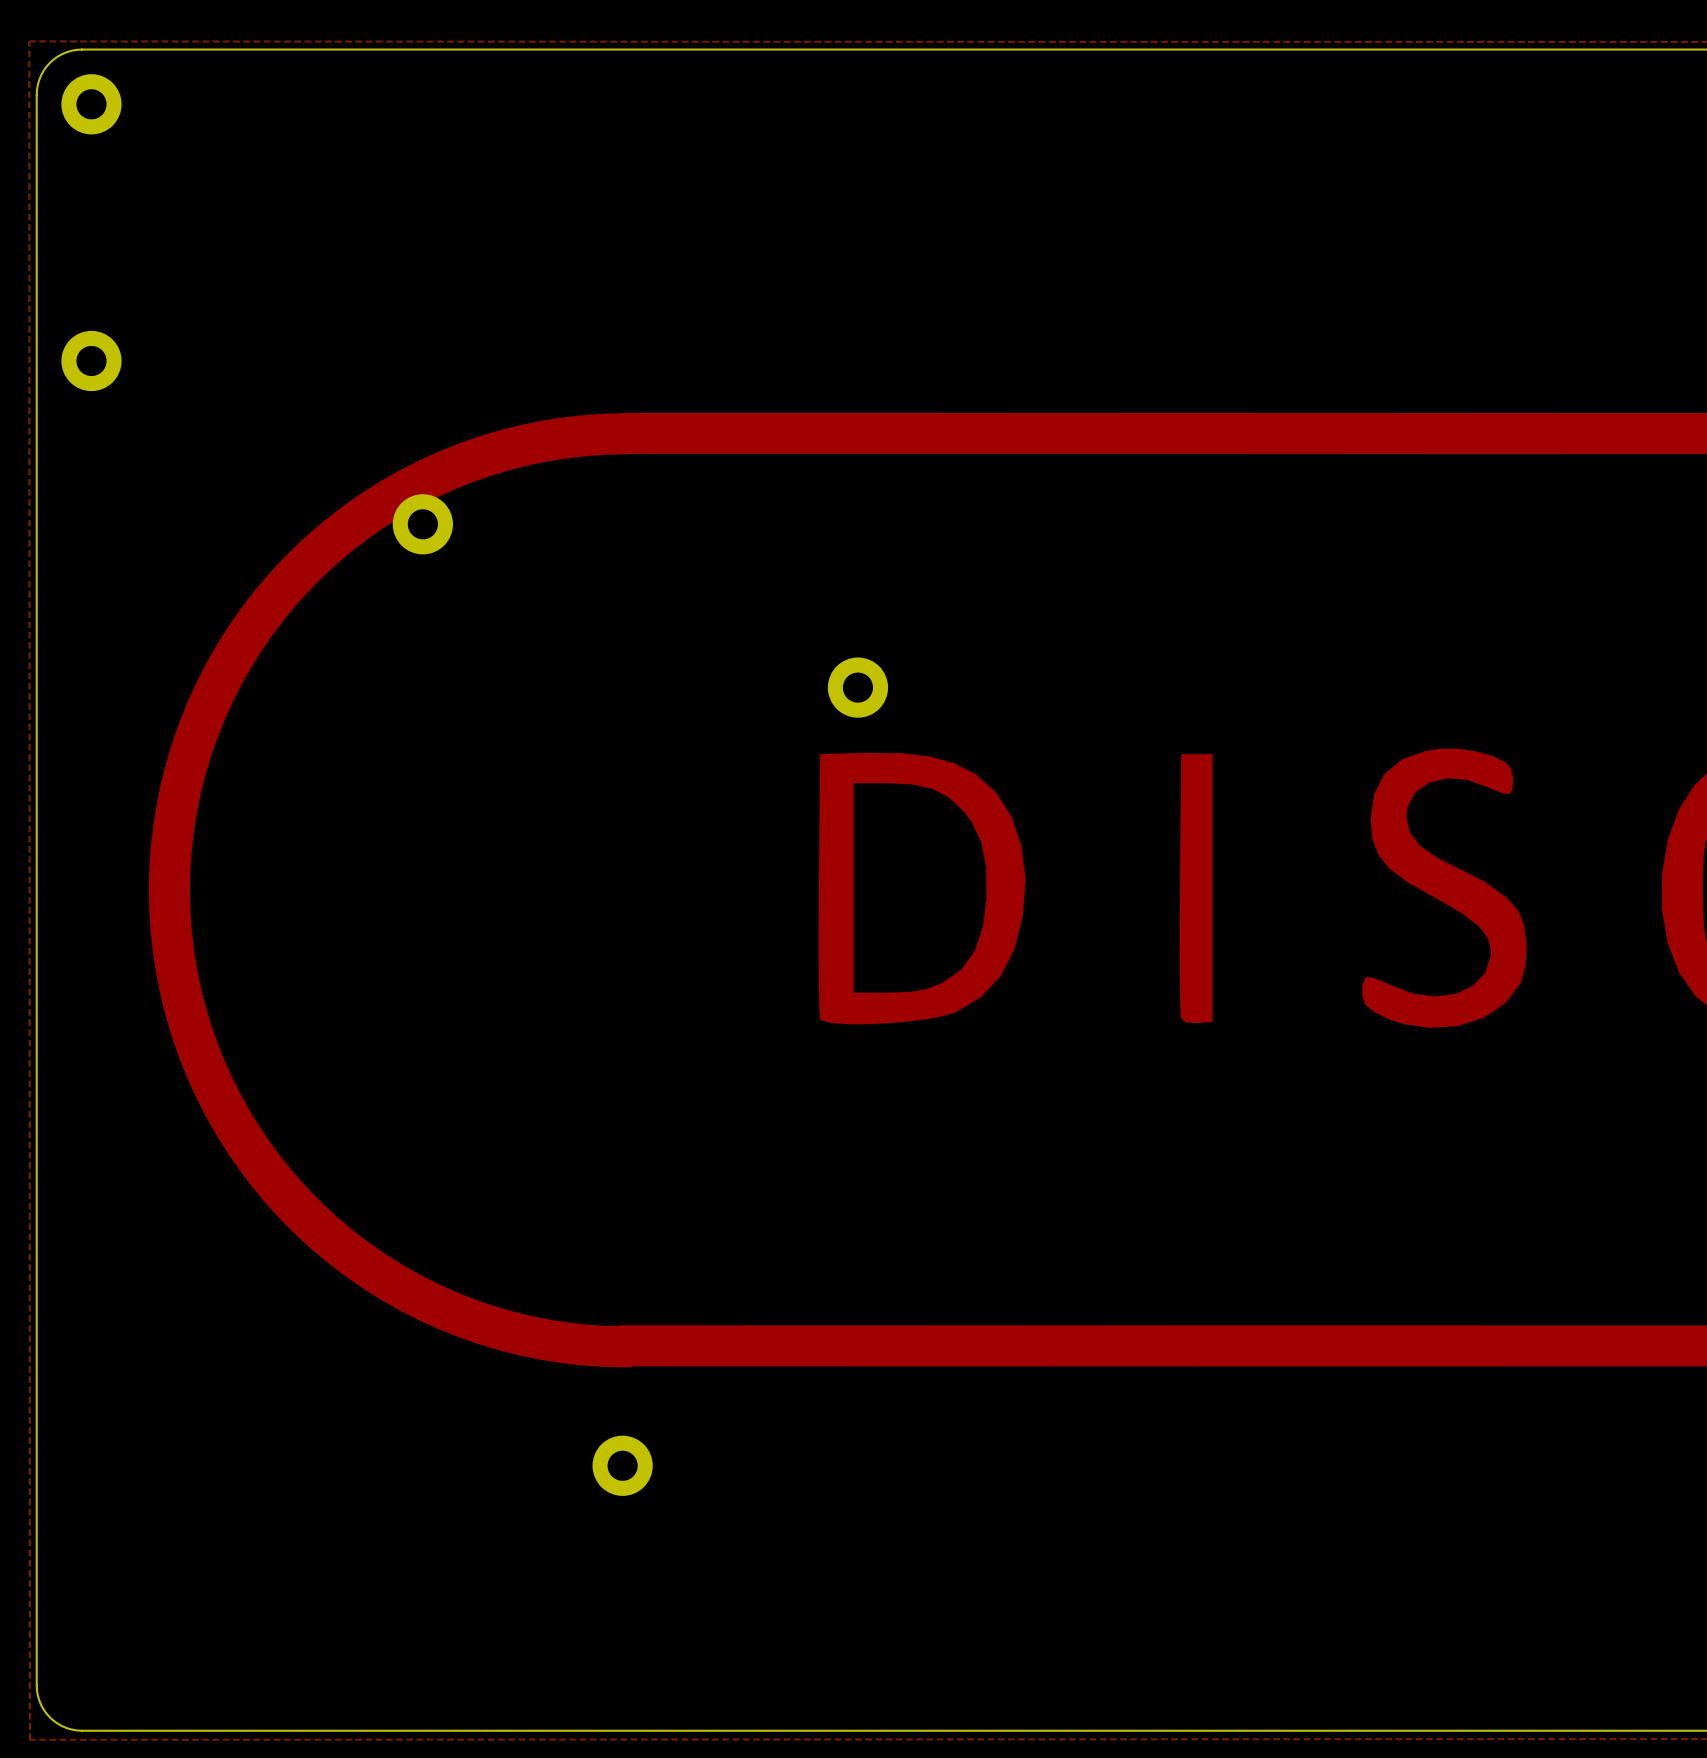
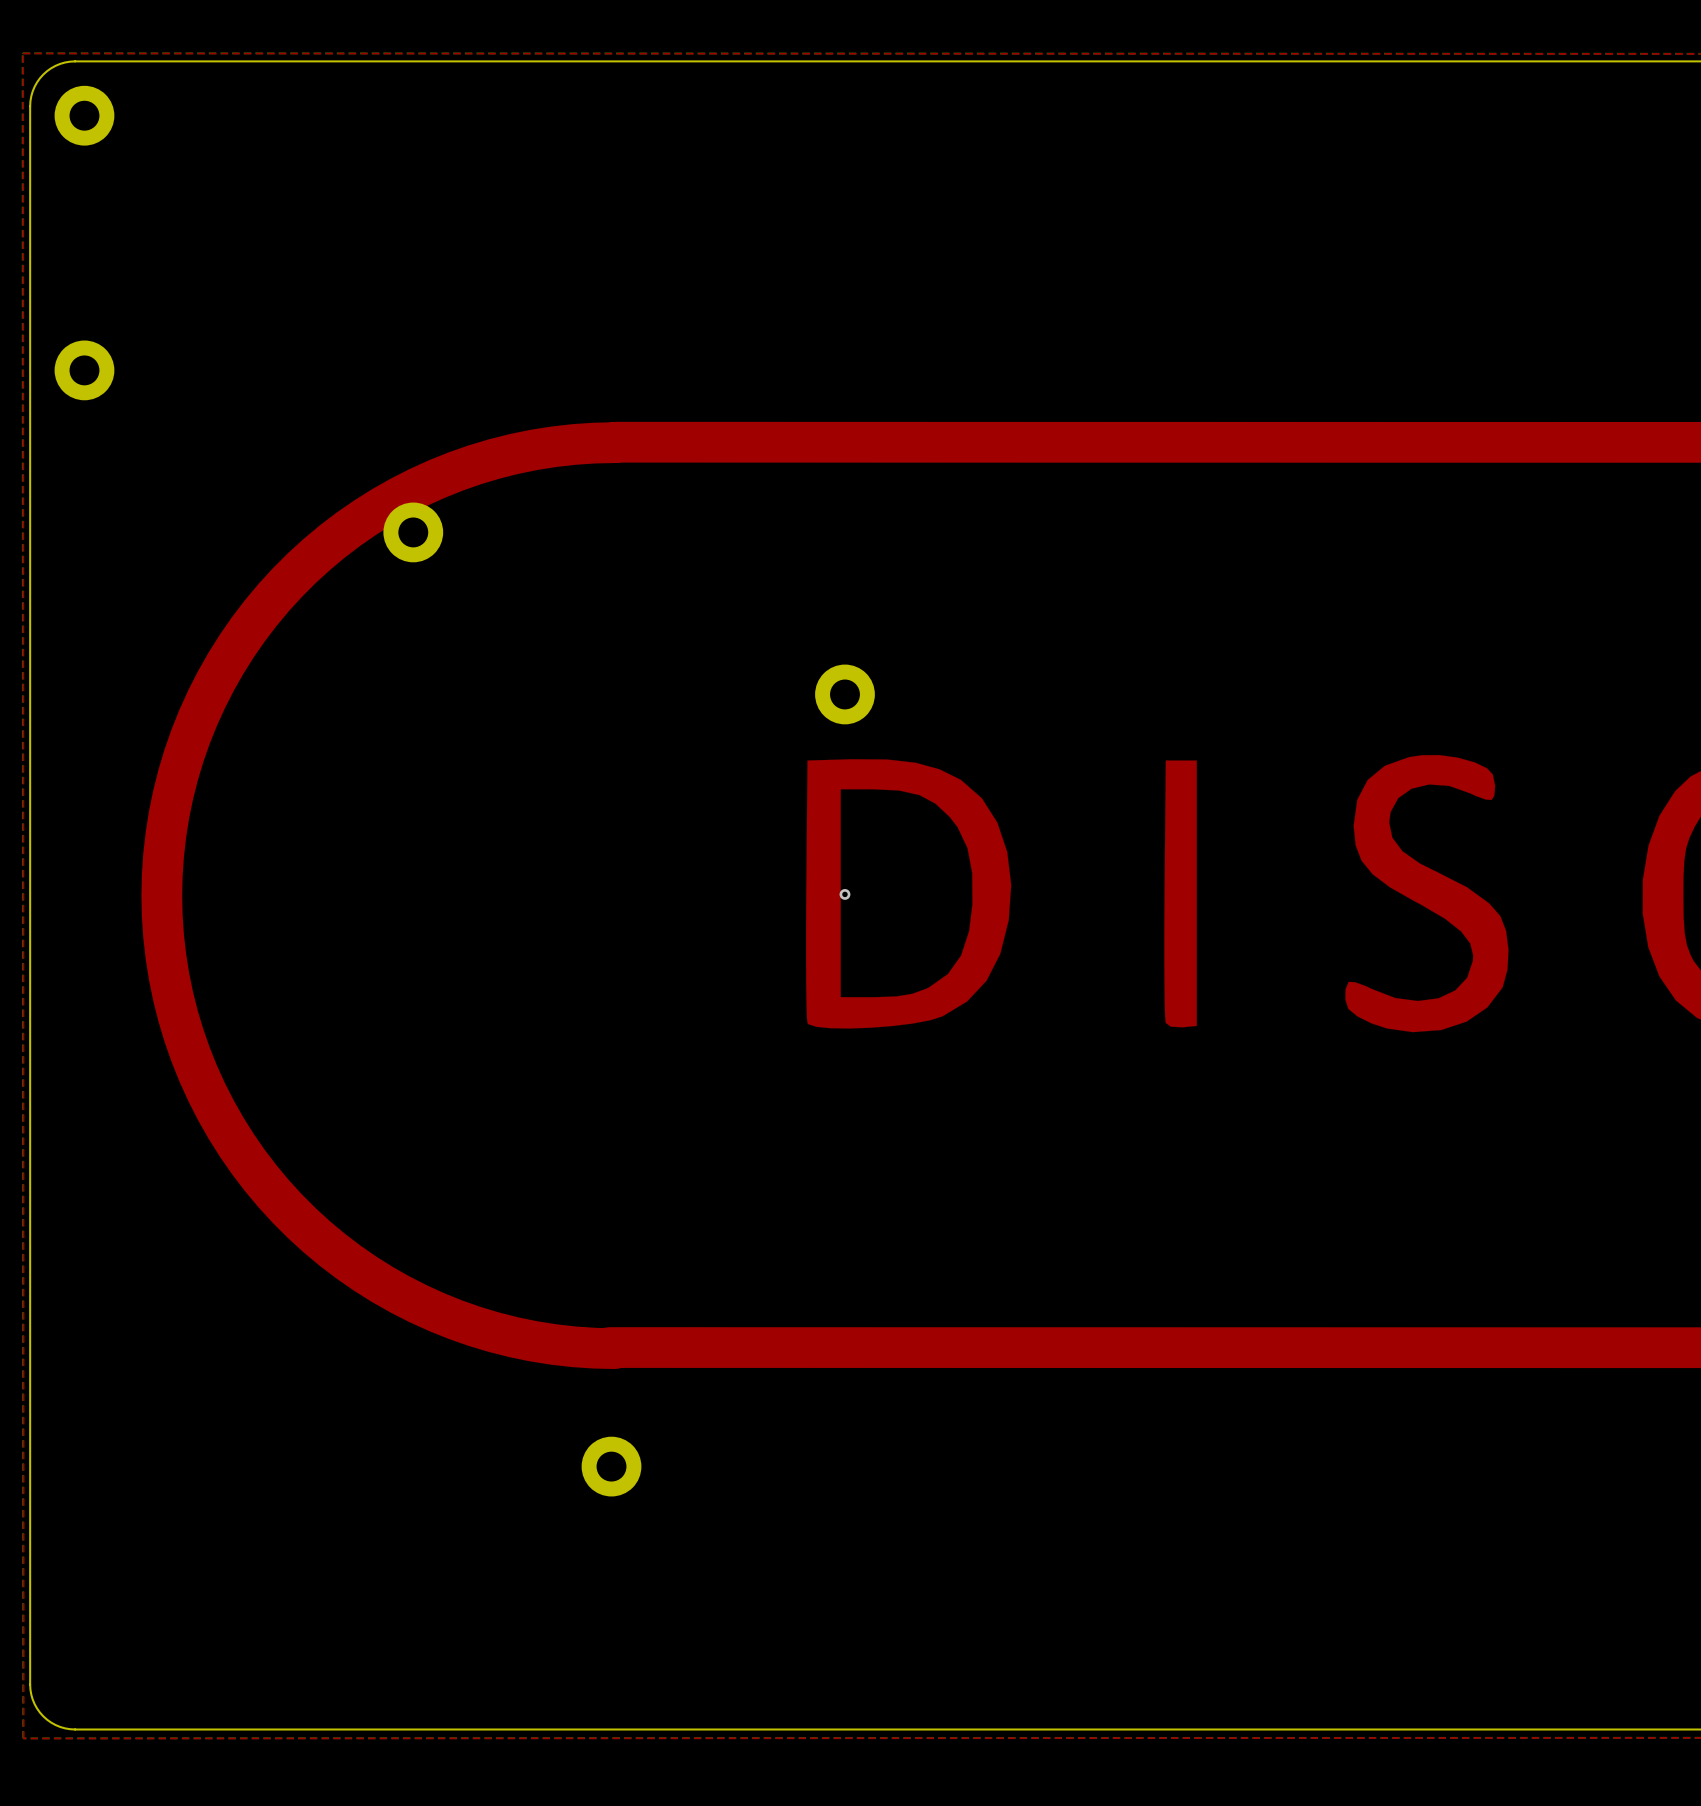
via: none -> (844, 894)

